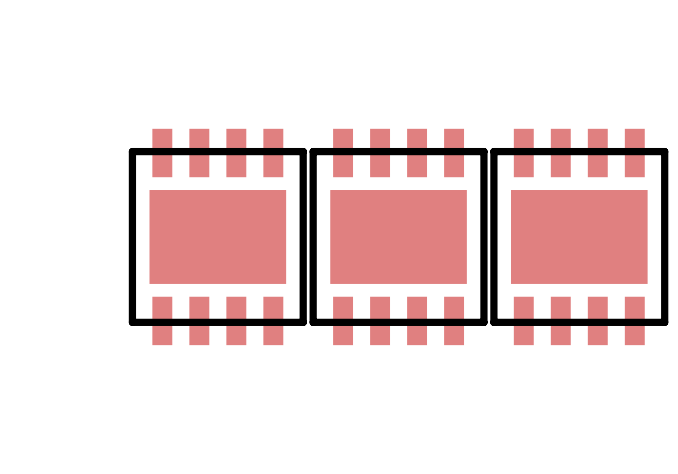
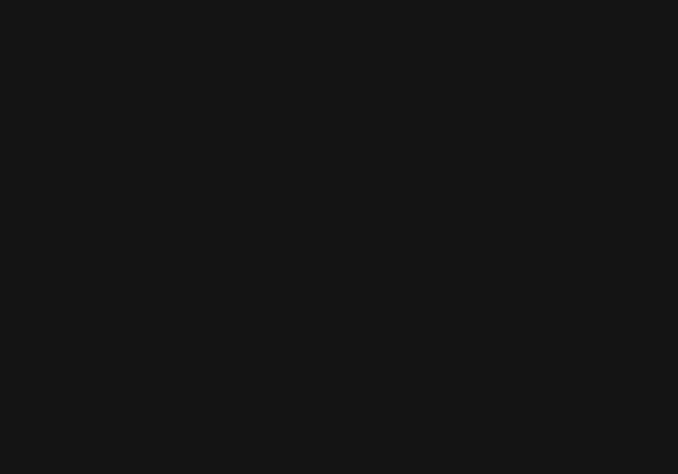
part: (217, 236) -> none
part: (398, 236) -> none
part: (579, 236) -> none

